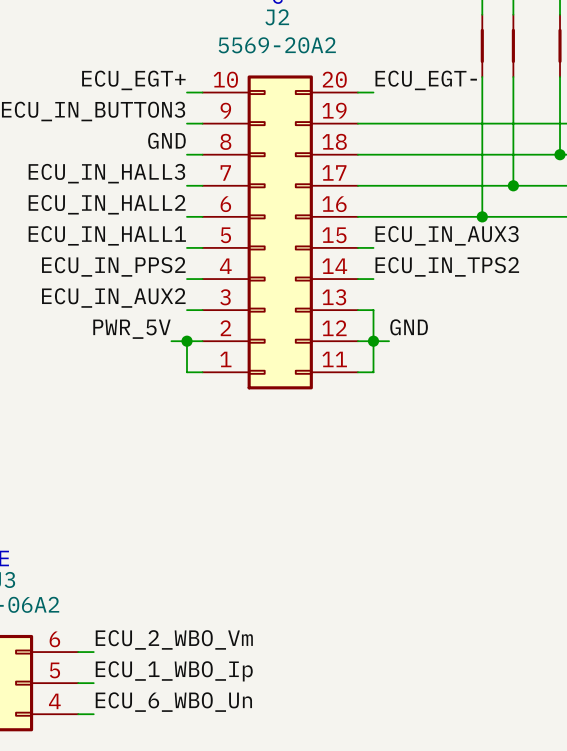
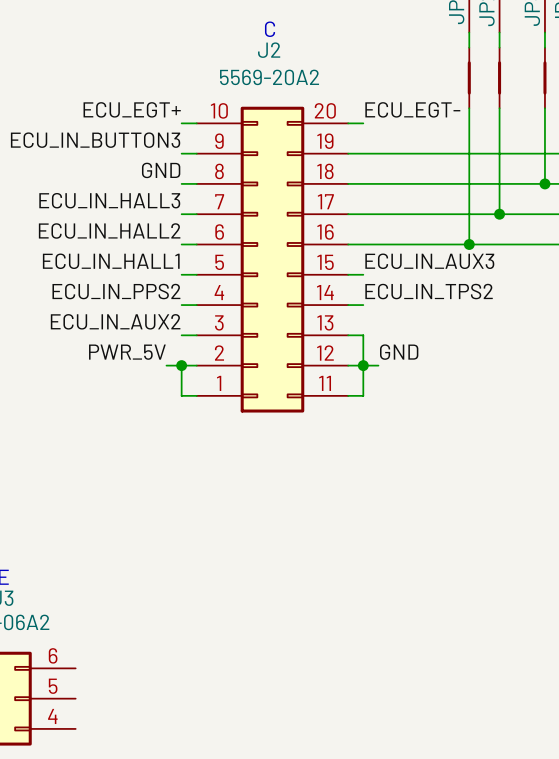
label: ECU_2_WBO_Vm (174, 639) -> none
wire: (78, 652) (93, 652) -> none
label: ECU_1_WBO_Ip (174, 671) -> none
wire: (78, 683) (93, 683) -> none
label: ECU_6_WBO_Un (173, 702) -> none
wire: (78, 714) (93, 714) -> none

